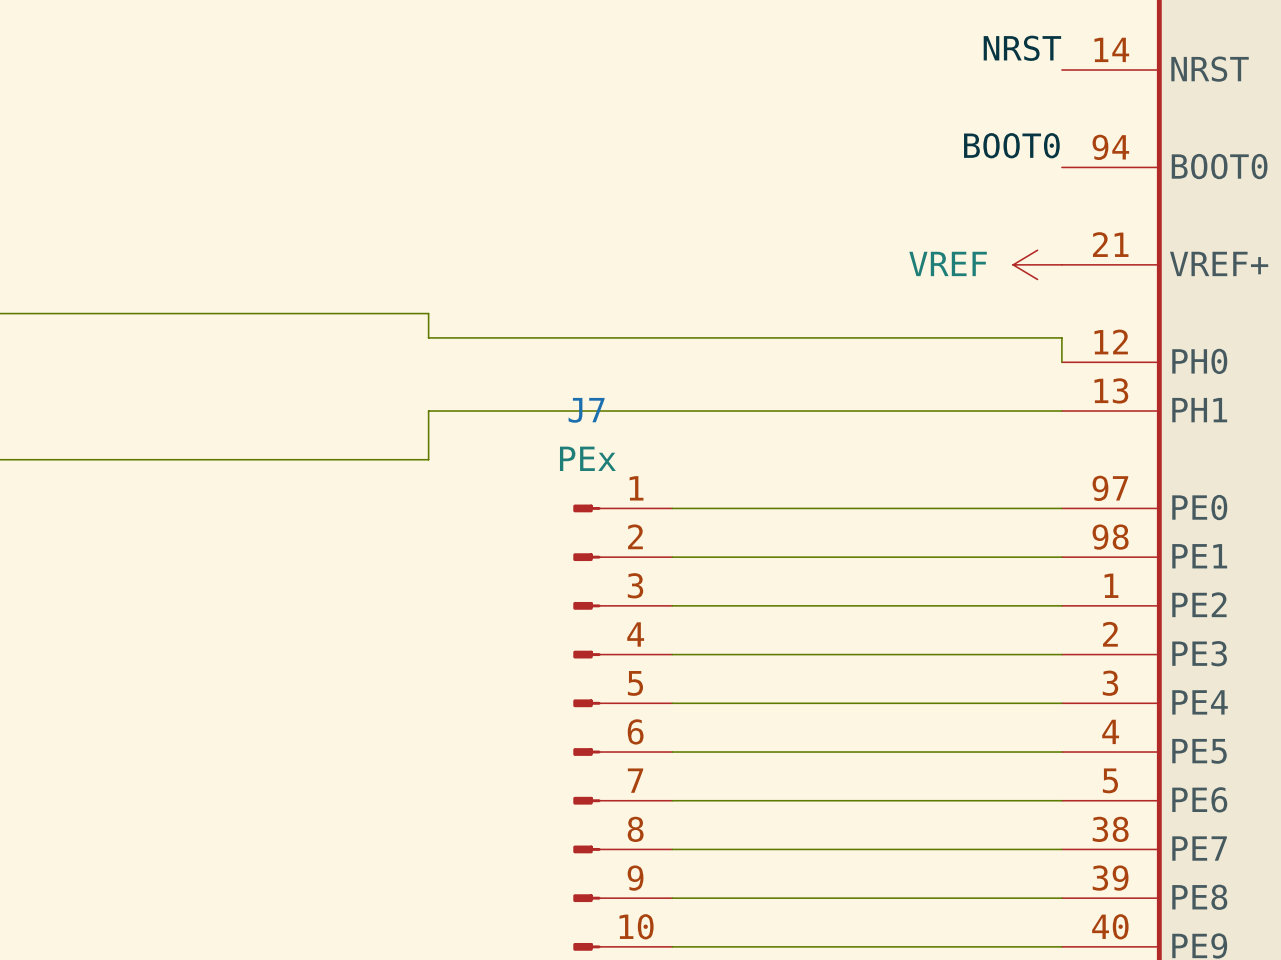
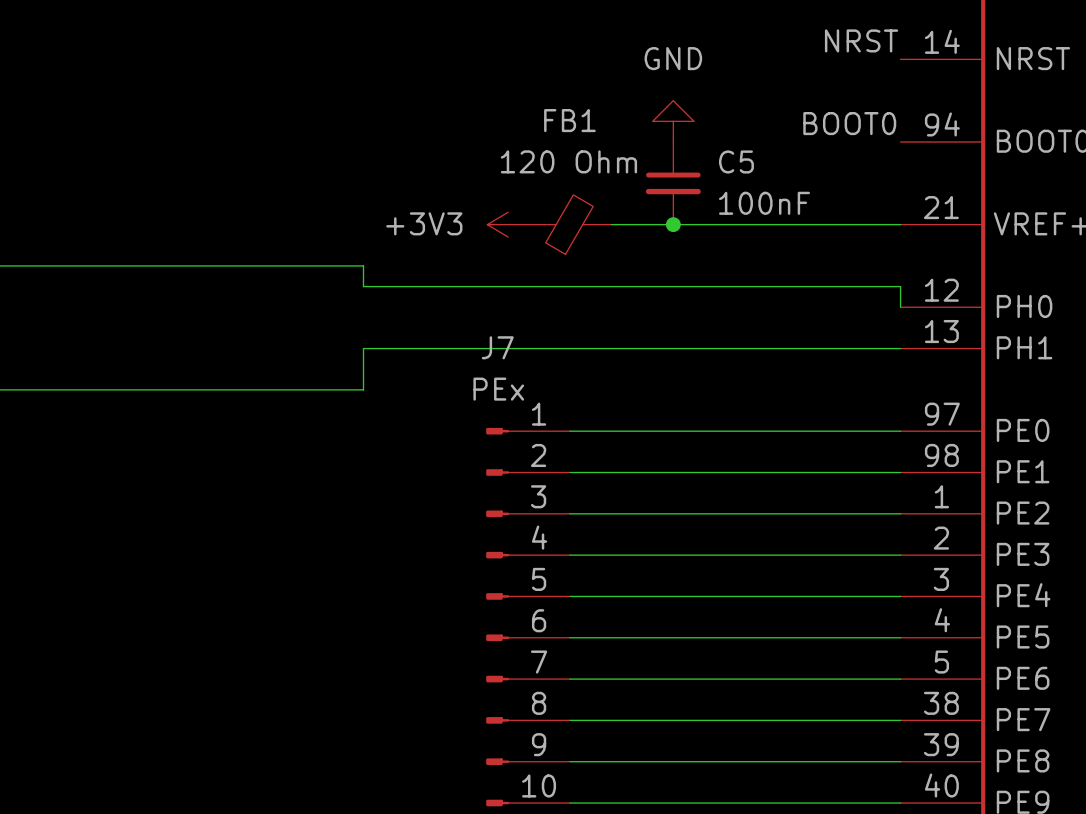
power symbol: none -> GND (673, 121)
C5: none -> 100nF (673, 183)
power symbol: none -> +3V3 (508, 224)
FB1: none -> 120 Ohm (570, 224)
wire: none -> (611, 224) (900, 224)
junction: none -> (673, 224)
power symbol: VREF (1037, 264) -> none

